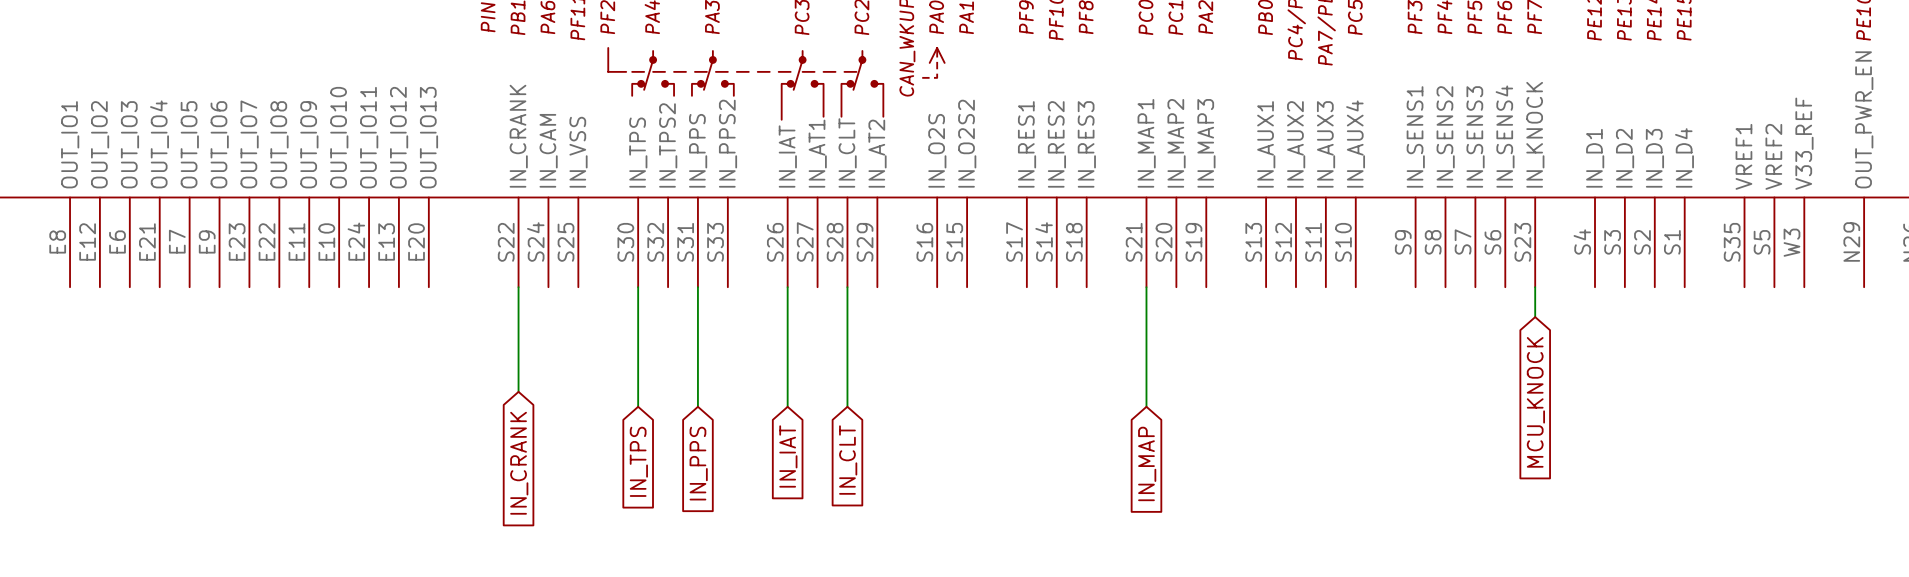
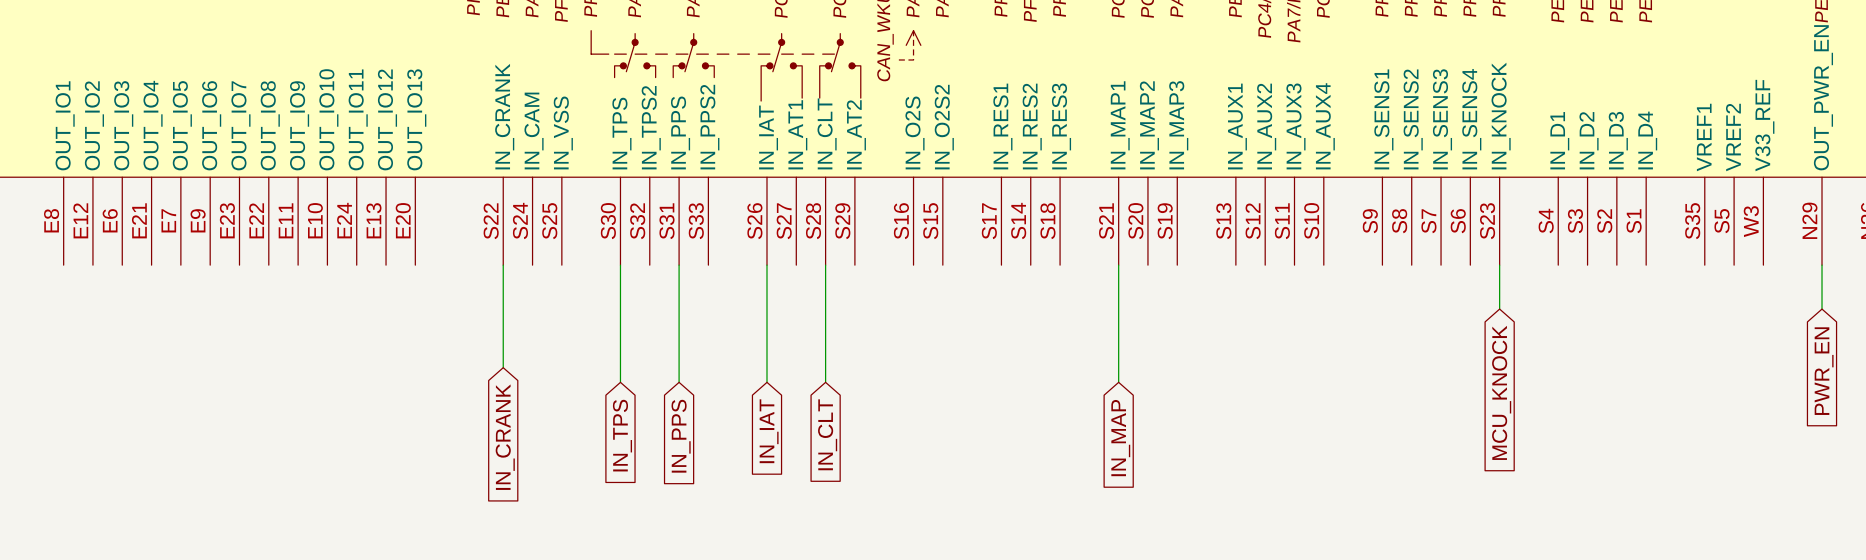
wire: none -> (1822, 265) (1822, 309)
wire: none -> (1499, 294) (1499, 309)
global label: none -> PWR_EN (1824, 371)
global label position: MCU_KNOCK (1535, 402) -> MCU_KNOCK (1501, 392)

